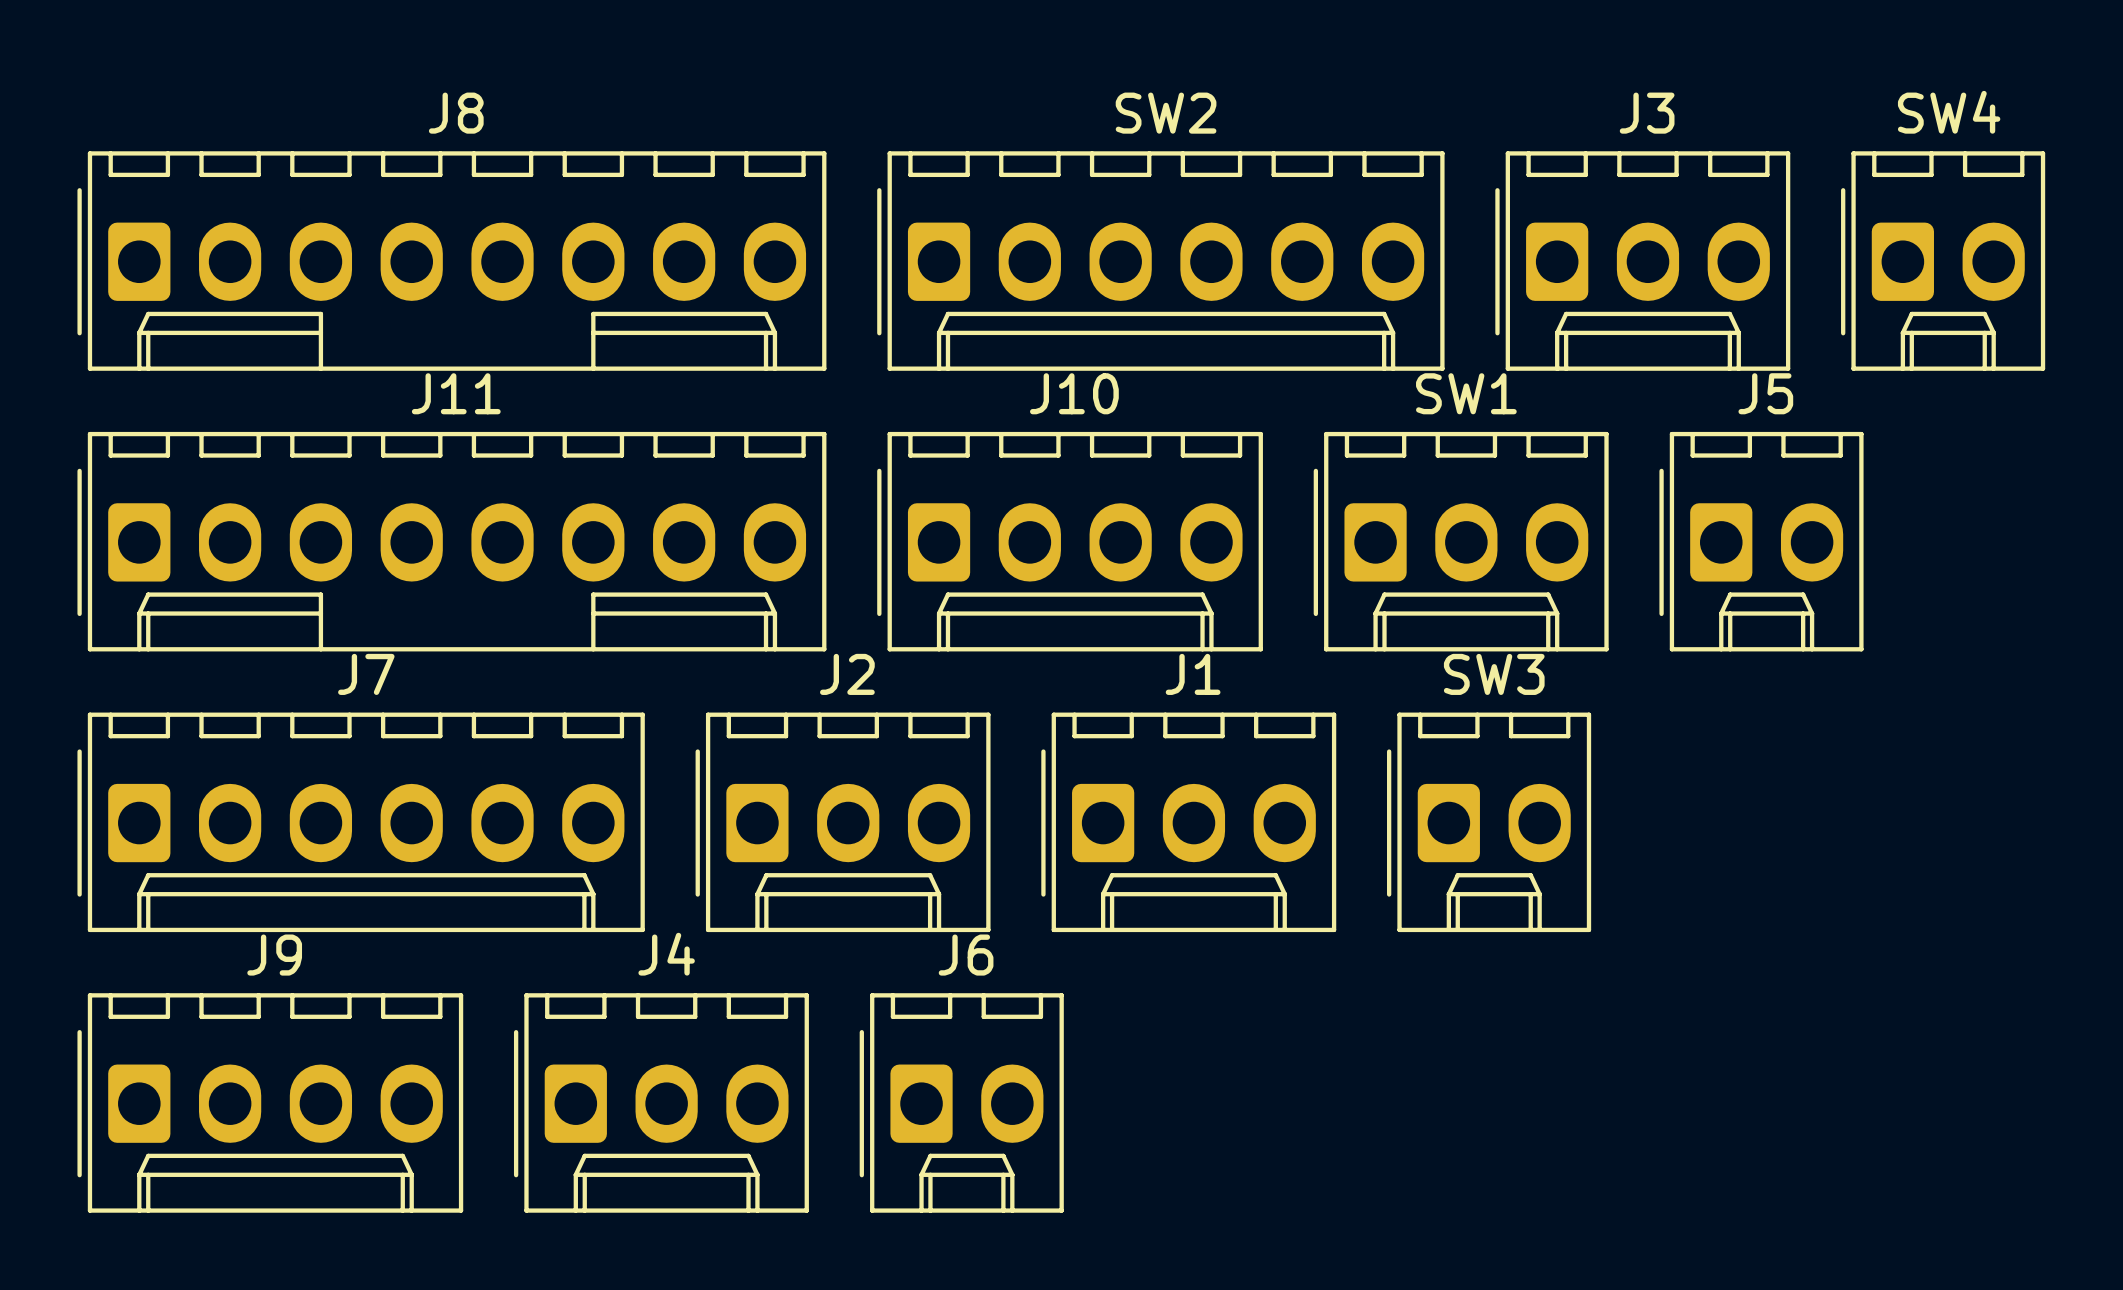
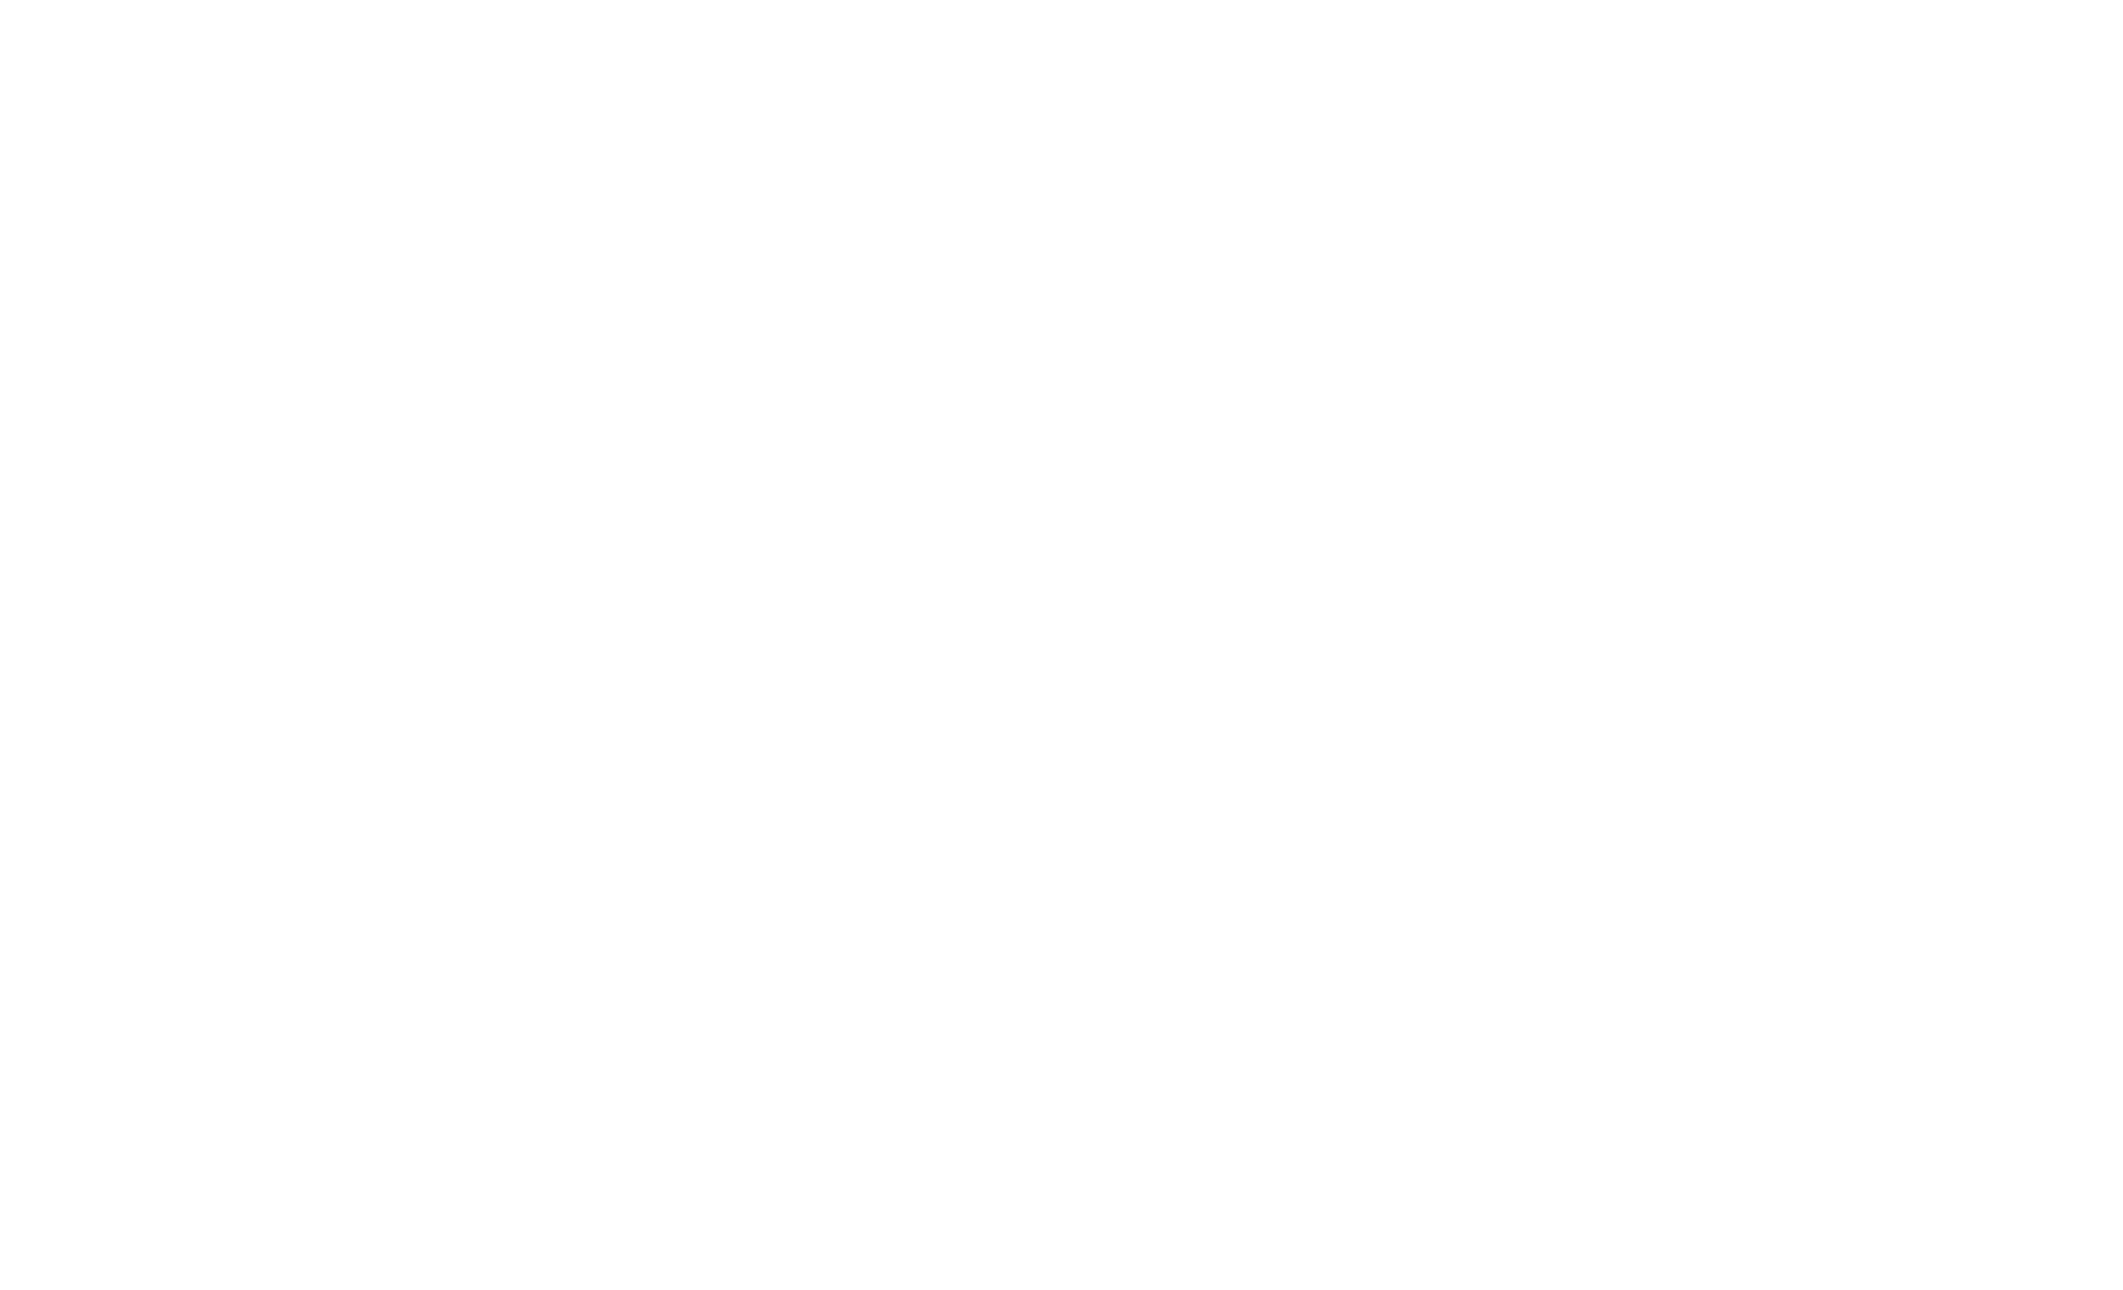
J8: (451, 261) -> none
SW2: (1160, 261) -> none
J3: (1642, 261) -> none
SW4: (1943, 261) -> none
J11: (451, 541) -> none
J10: (1070, 541) -> none
SW1: (1461, 541) -> none
J5: (1761, 541) -> none
J7: (361, 822) -> none
J2: (843, 822) -> none
J1: (1188, 822) -> none
SW3: (1489, 822) -> none
J9: (270, 1102) -> none
J4: (661, 1102) -> none
J6: (961, 1102) -> none

